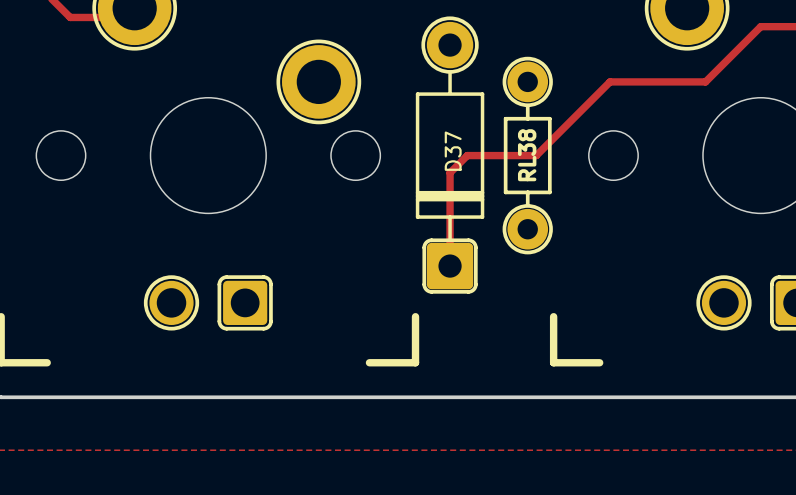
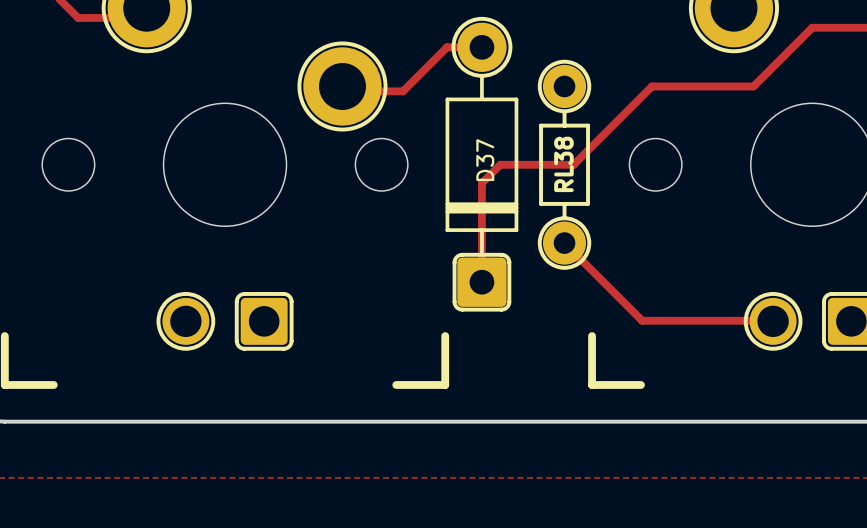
track: none -> (481, 47) (447, 47) (403, 91) (344, 91)
track: none -> (564, 243) (642, 320) (766, 320)

